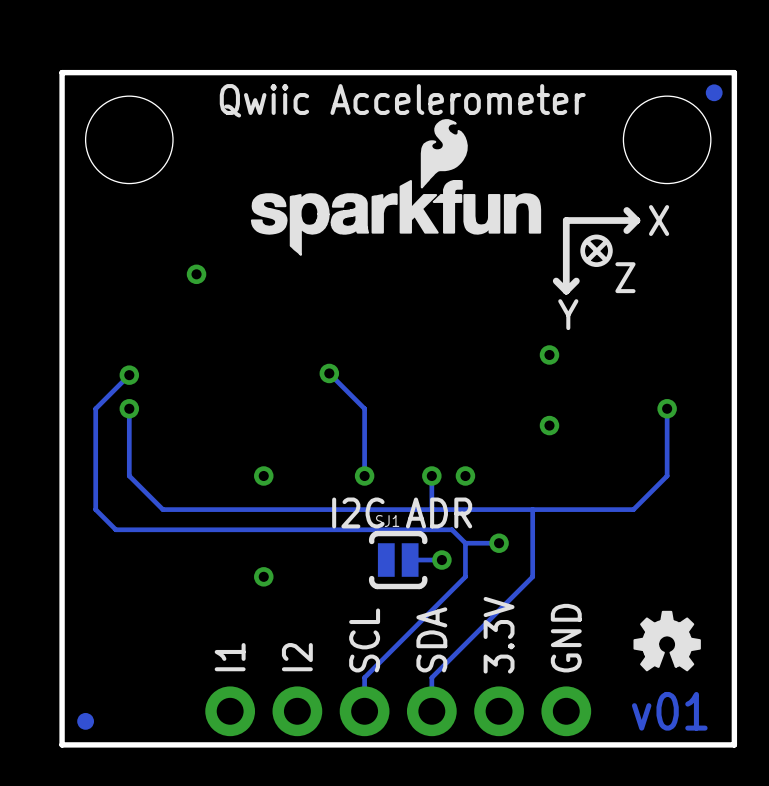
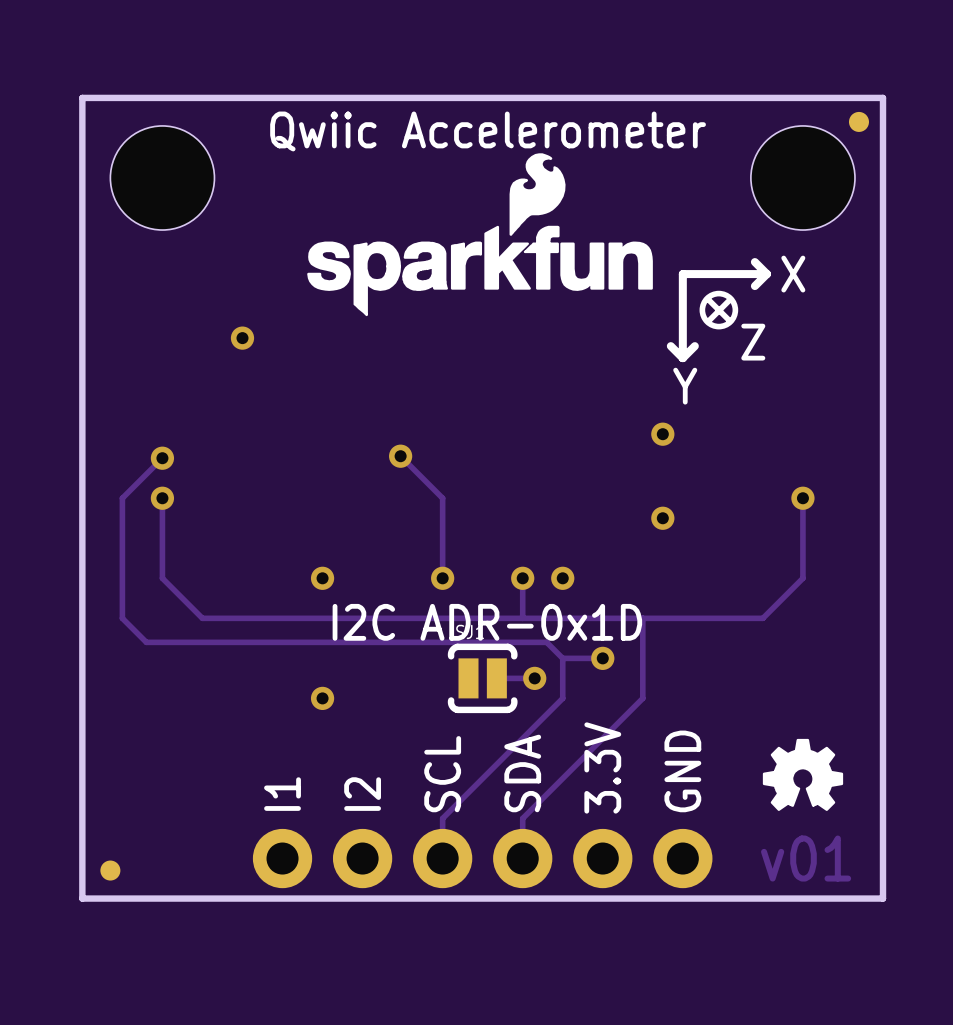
text: I2C ADR (402, 512) -> I2C ADR-0x1D (487, 622)

